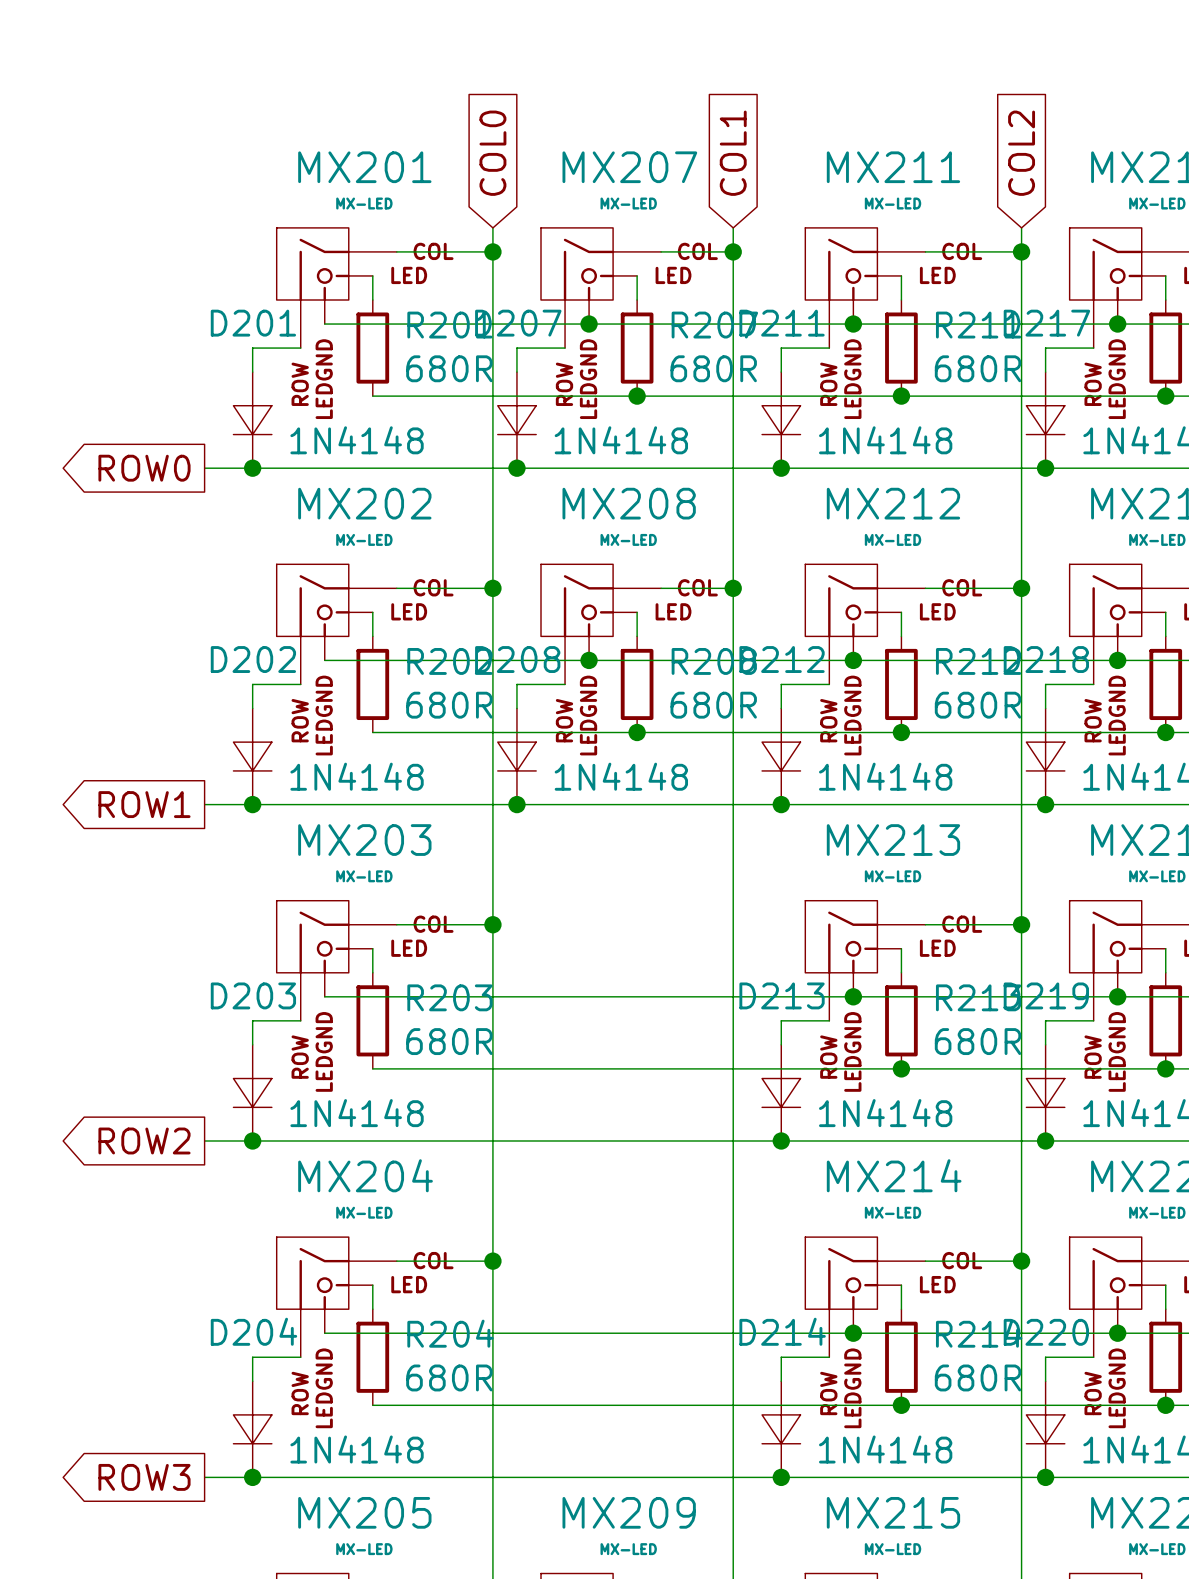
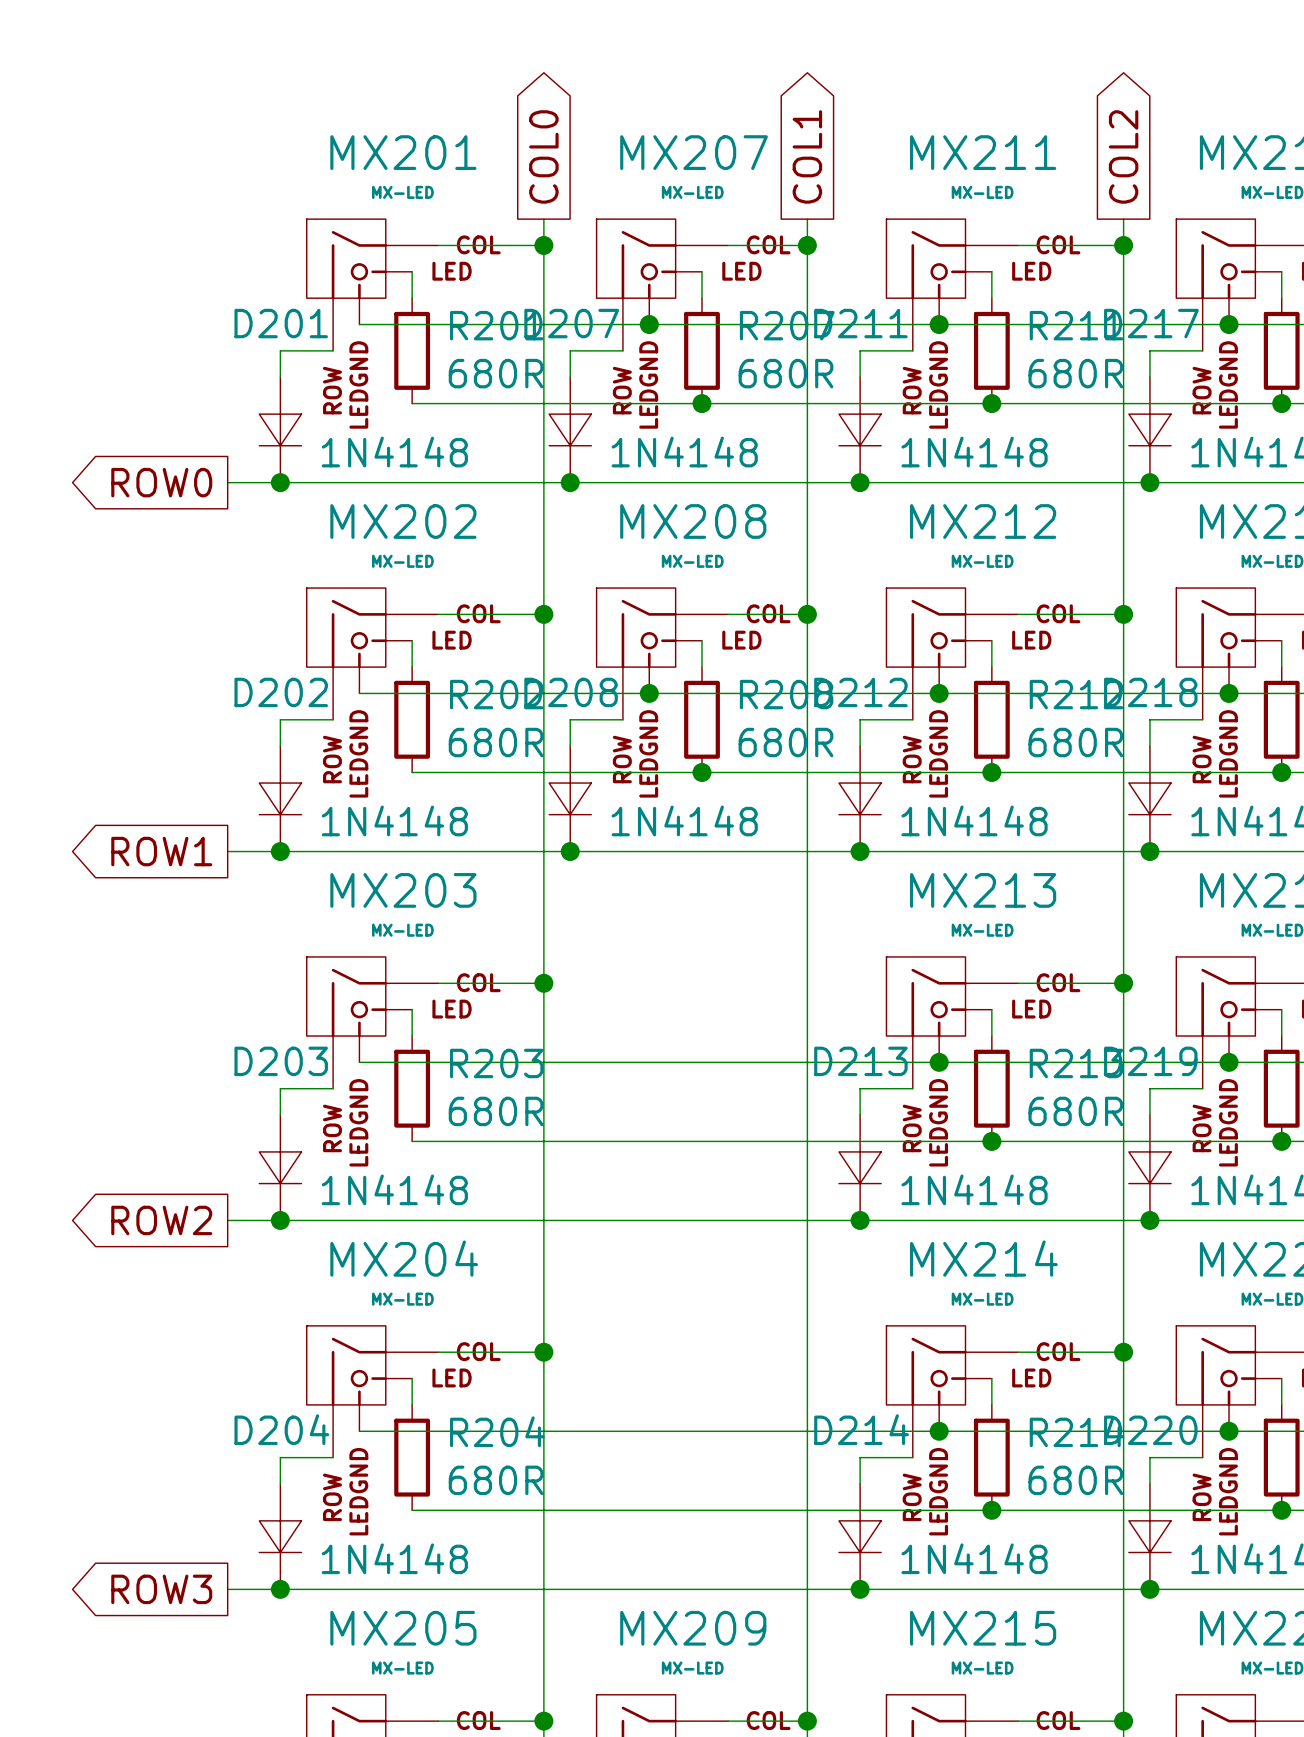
global label shape: input (492, 153) -> output (543, 156)
global label shape: input (733, 153) -> output (807, 156)
global label shape: input (1021, 153) -> output (1123, 156)

